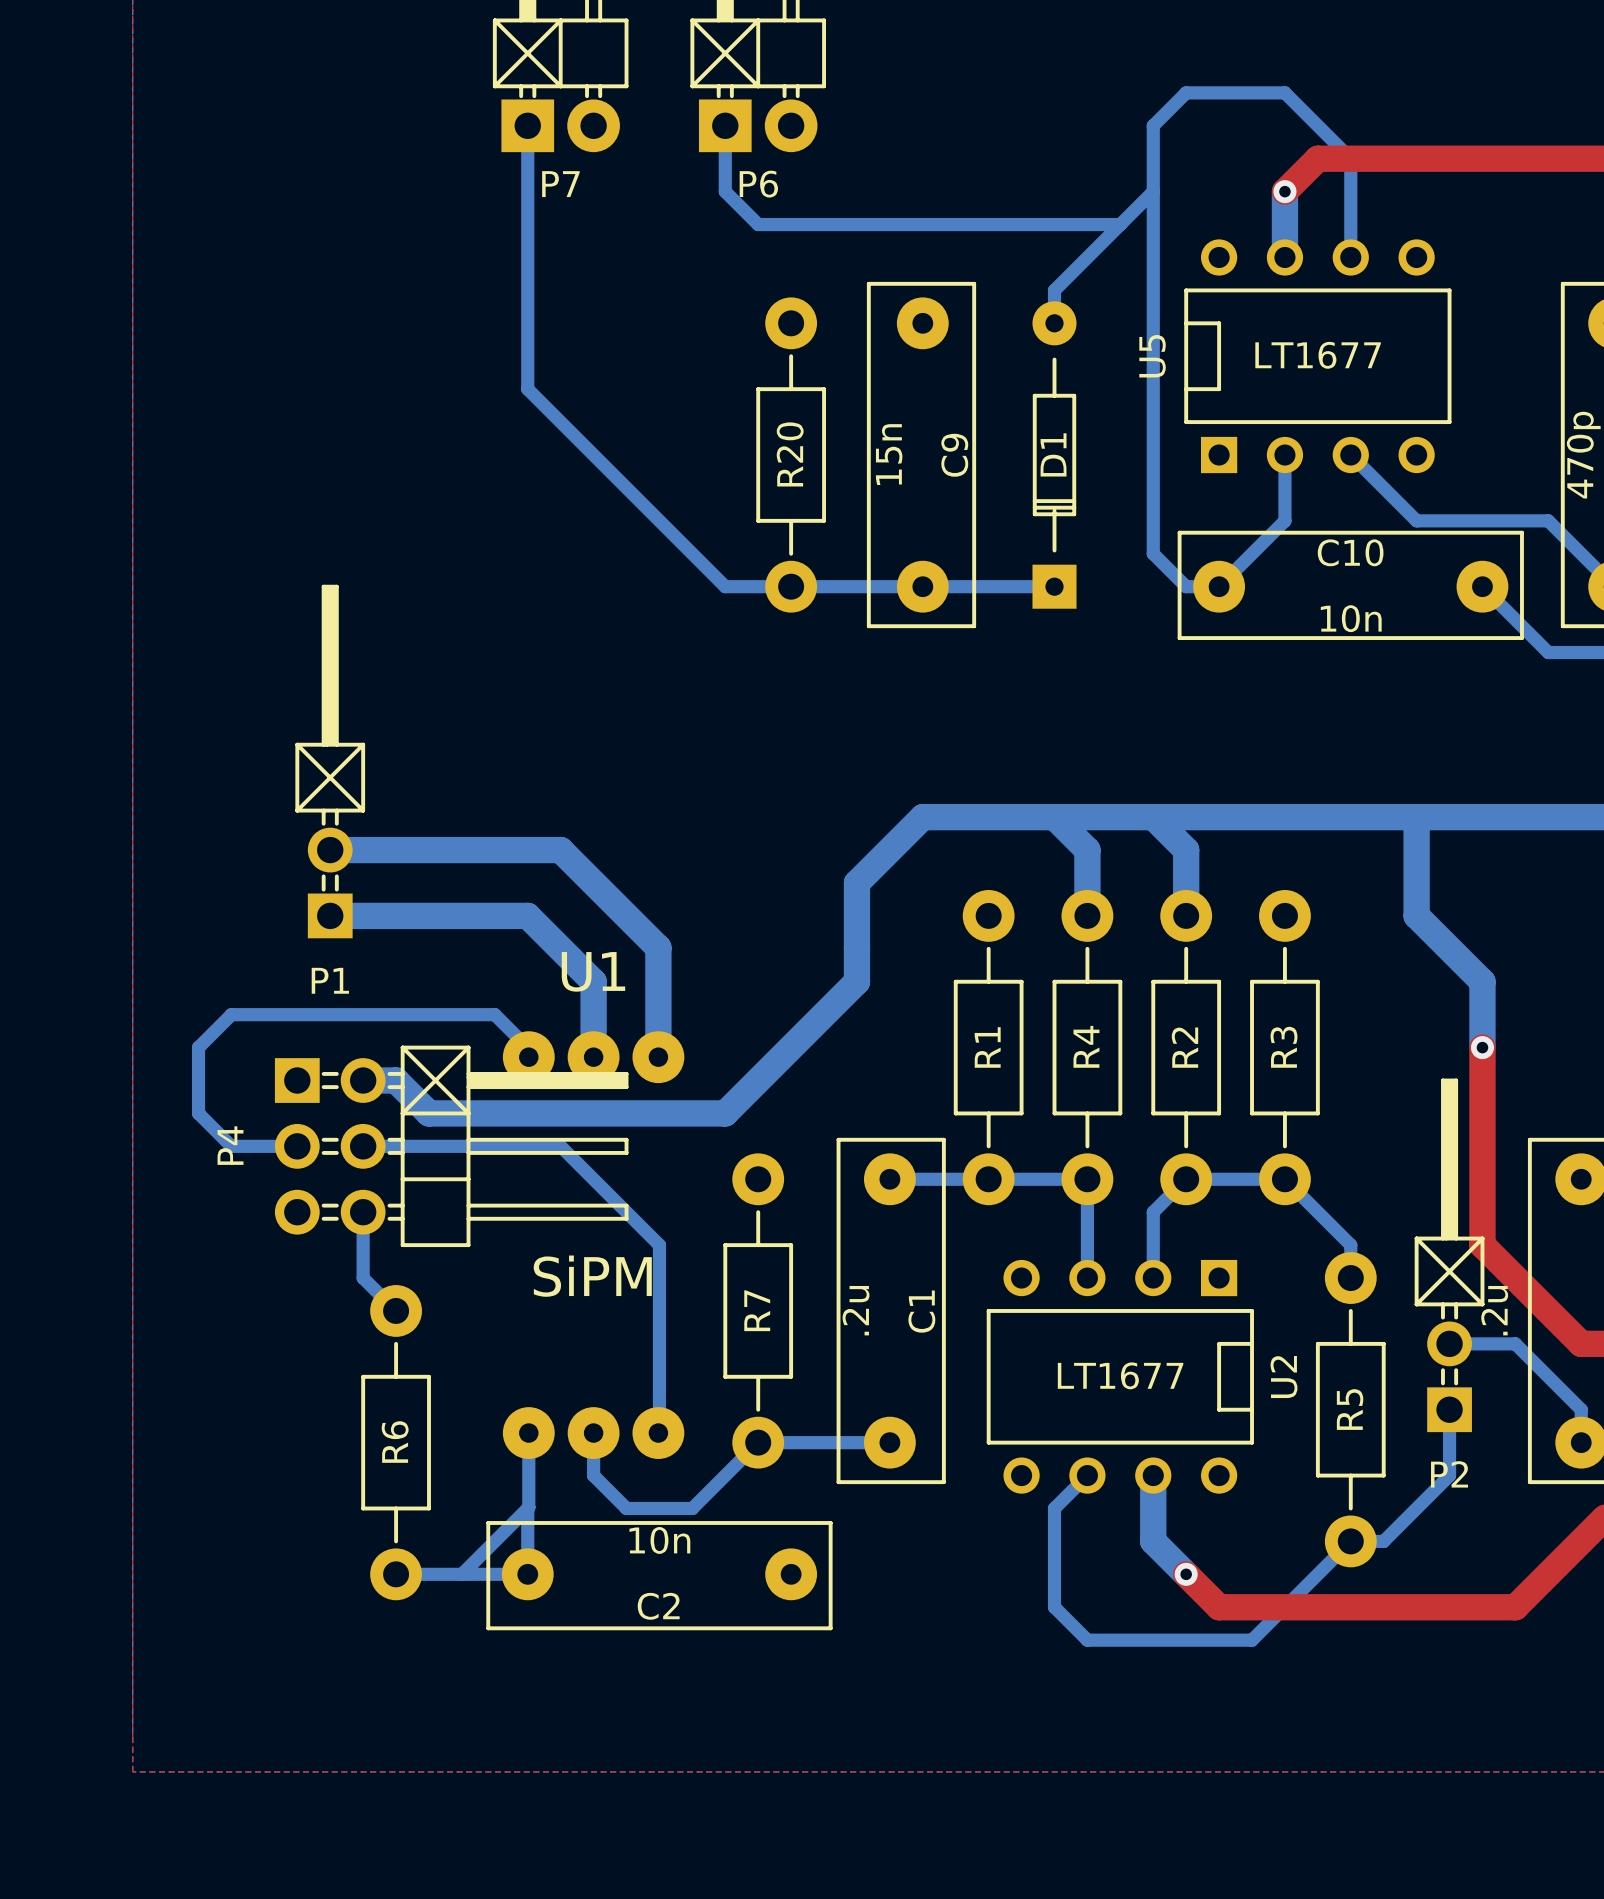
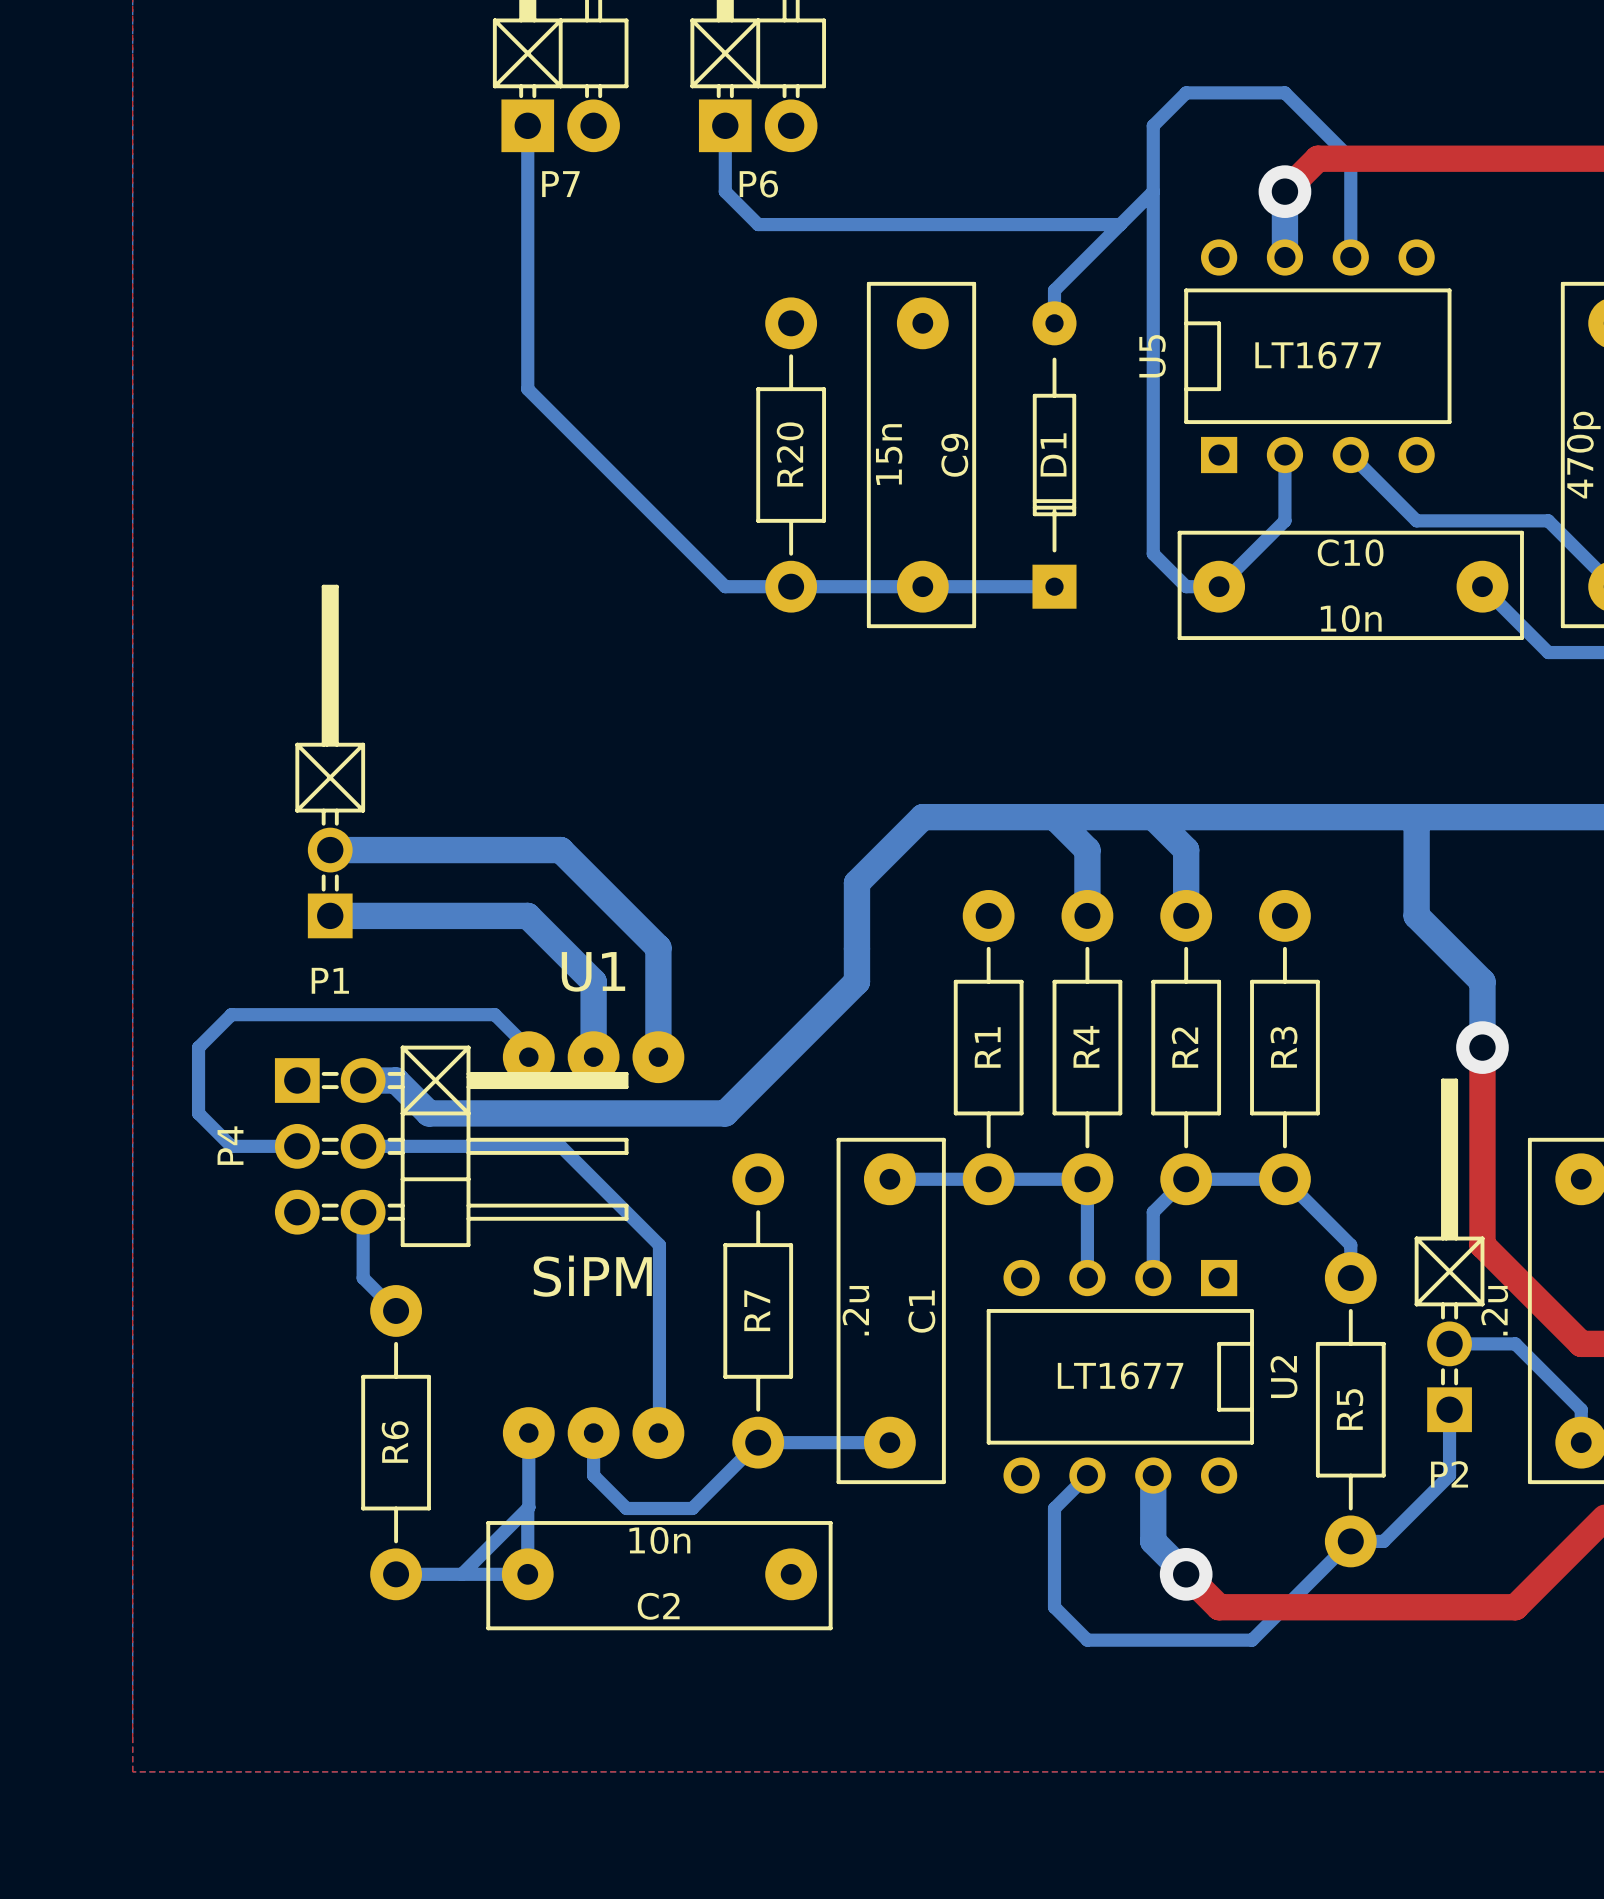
via size: [1273, 180, 1297, 204] -> [1258, 165, 1312, 218]
via size: [1470, 1036, 1495, 1060] -> [1456, 1021, 1509, 1074]
via size: [1174, 1562, 1198, 1586] -> [1159, 1547, 1213, 1601]

